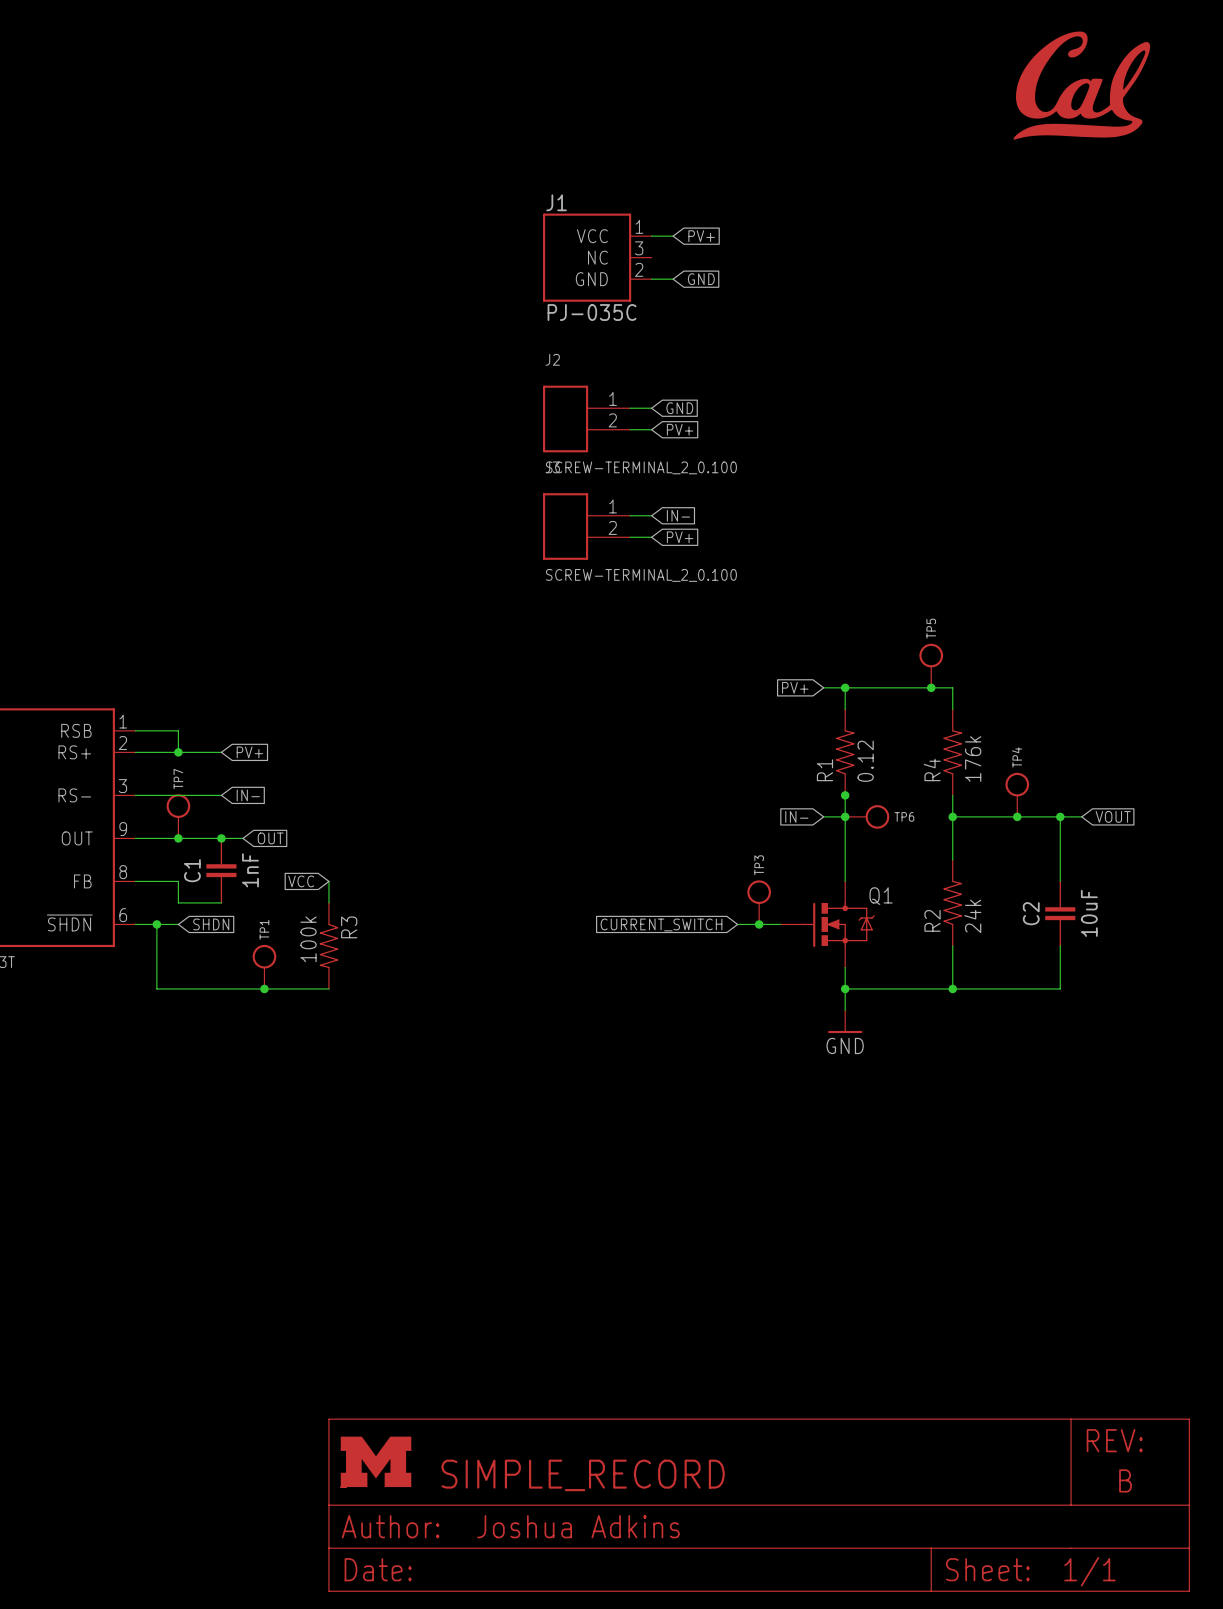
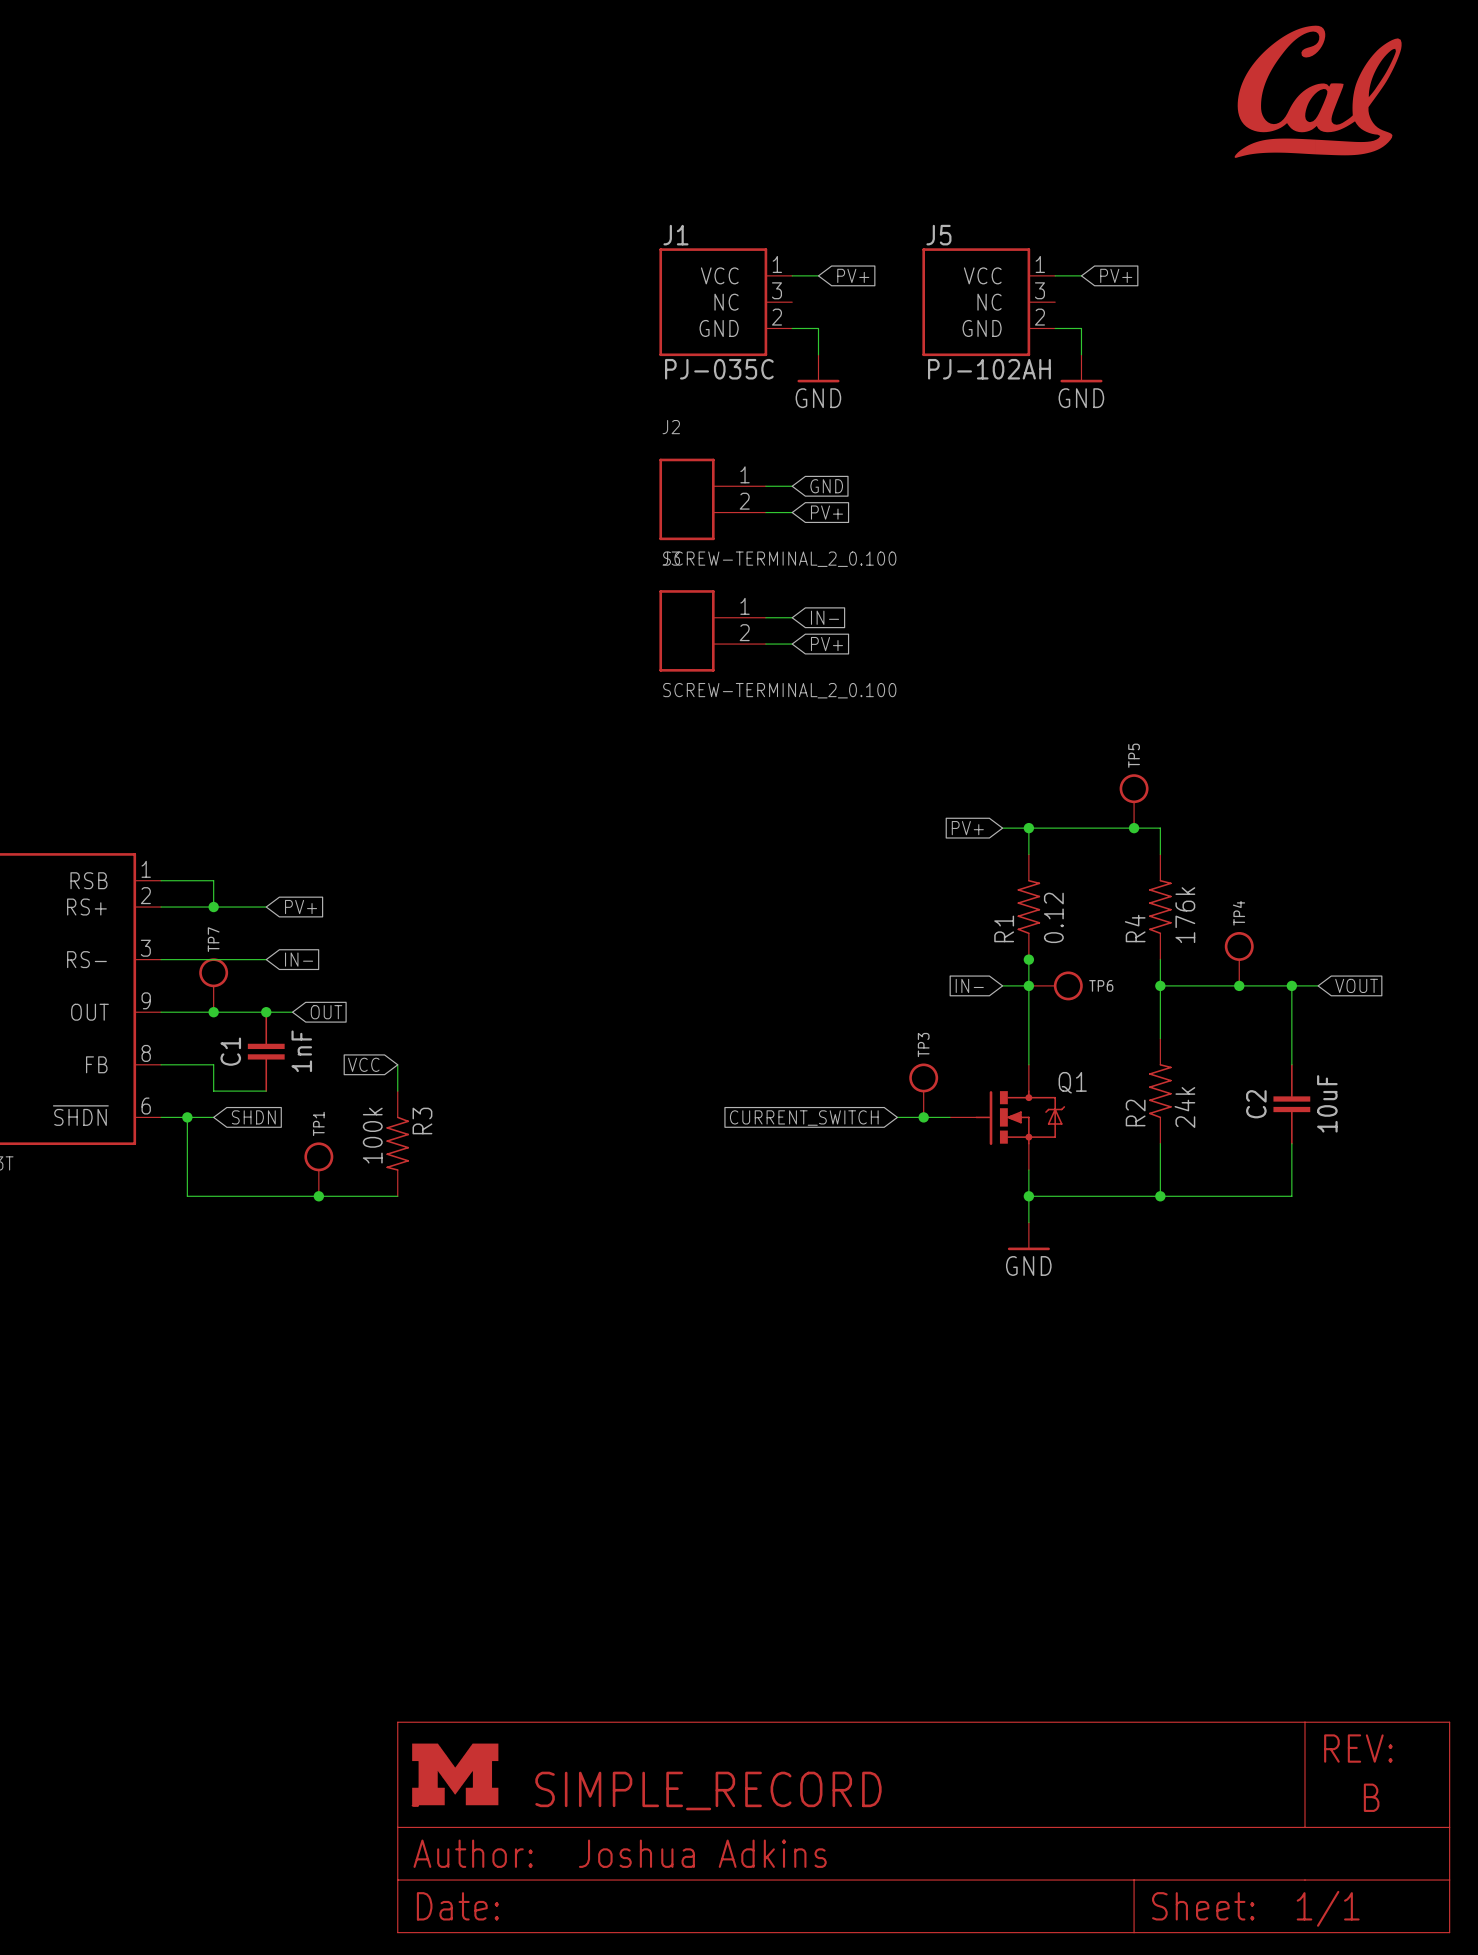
wire: none -> (1055, 275) (1081, 275)
global label: none -> PV+ (1116, 275)
J5: none -> PJ-102AH (988, 302)
wire: none -> (818, 328) (818, 354)
global label: GND (701, 279) -> none
wire: none -> (1055, 328) (1081, 328) (1081, 354)
power symbol: none -> GND (818, 368)
power symbol: none -> GND (1081, 368)

